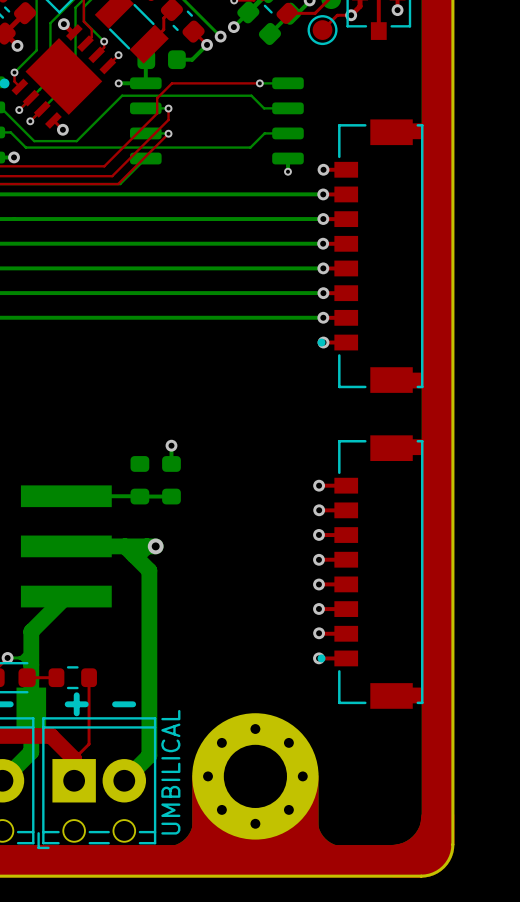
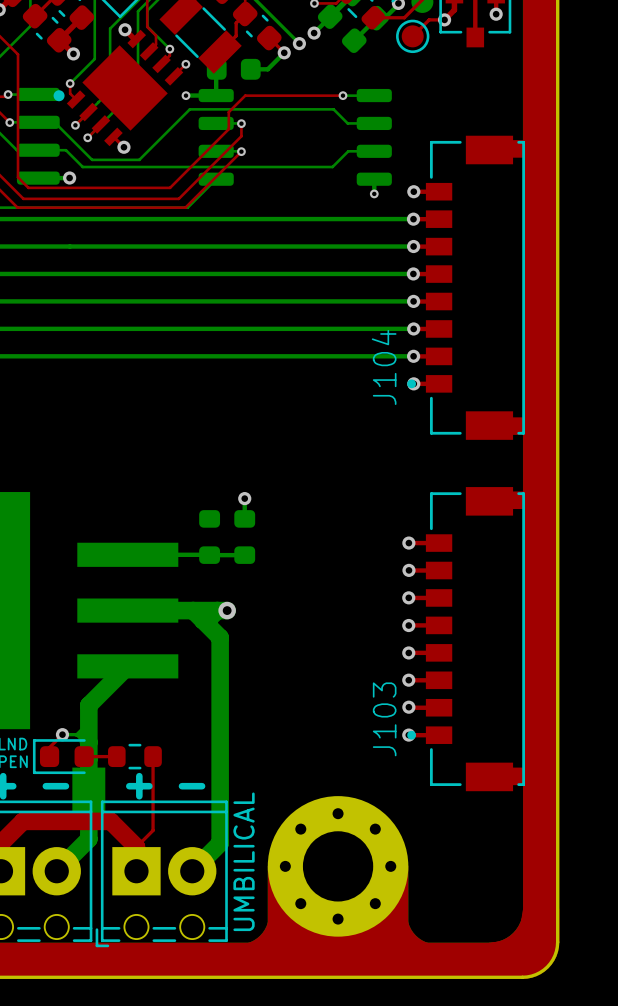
J104 name: none -> J104 (384, 367)
J103 name: none -> J103 (384, 719)

